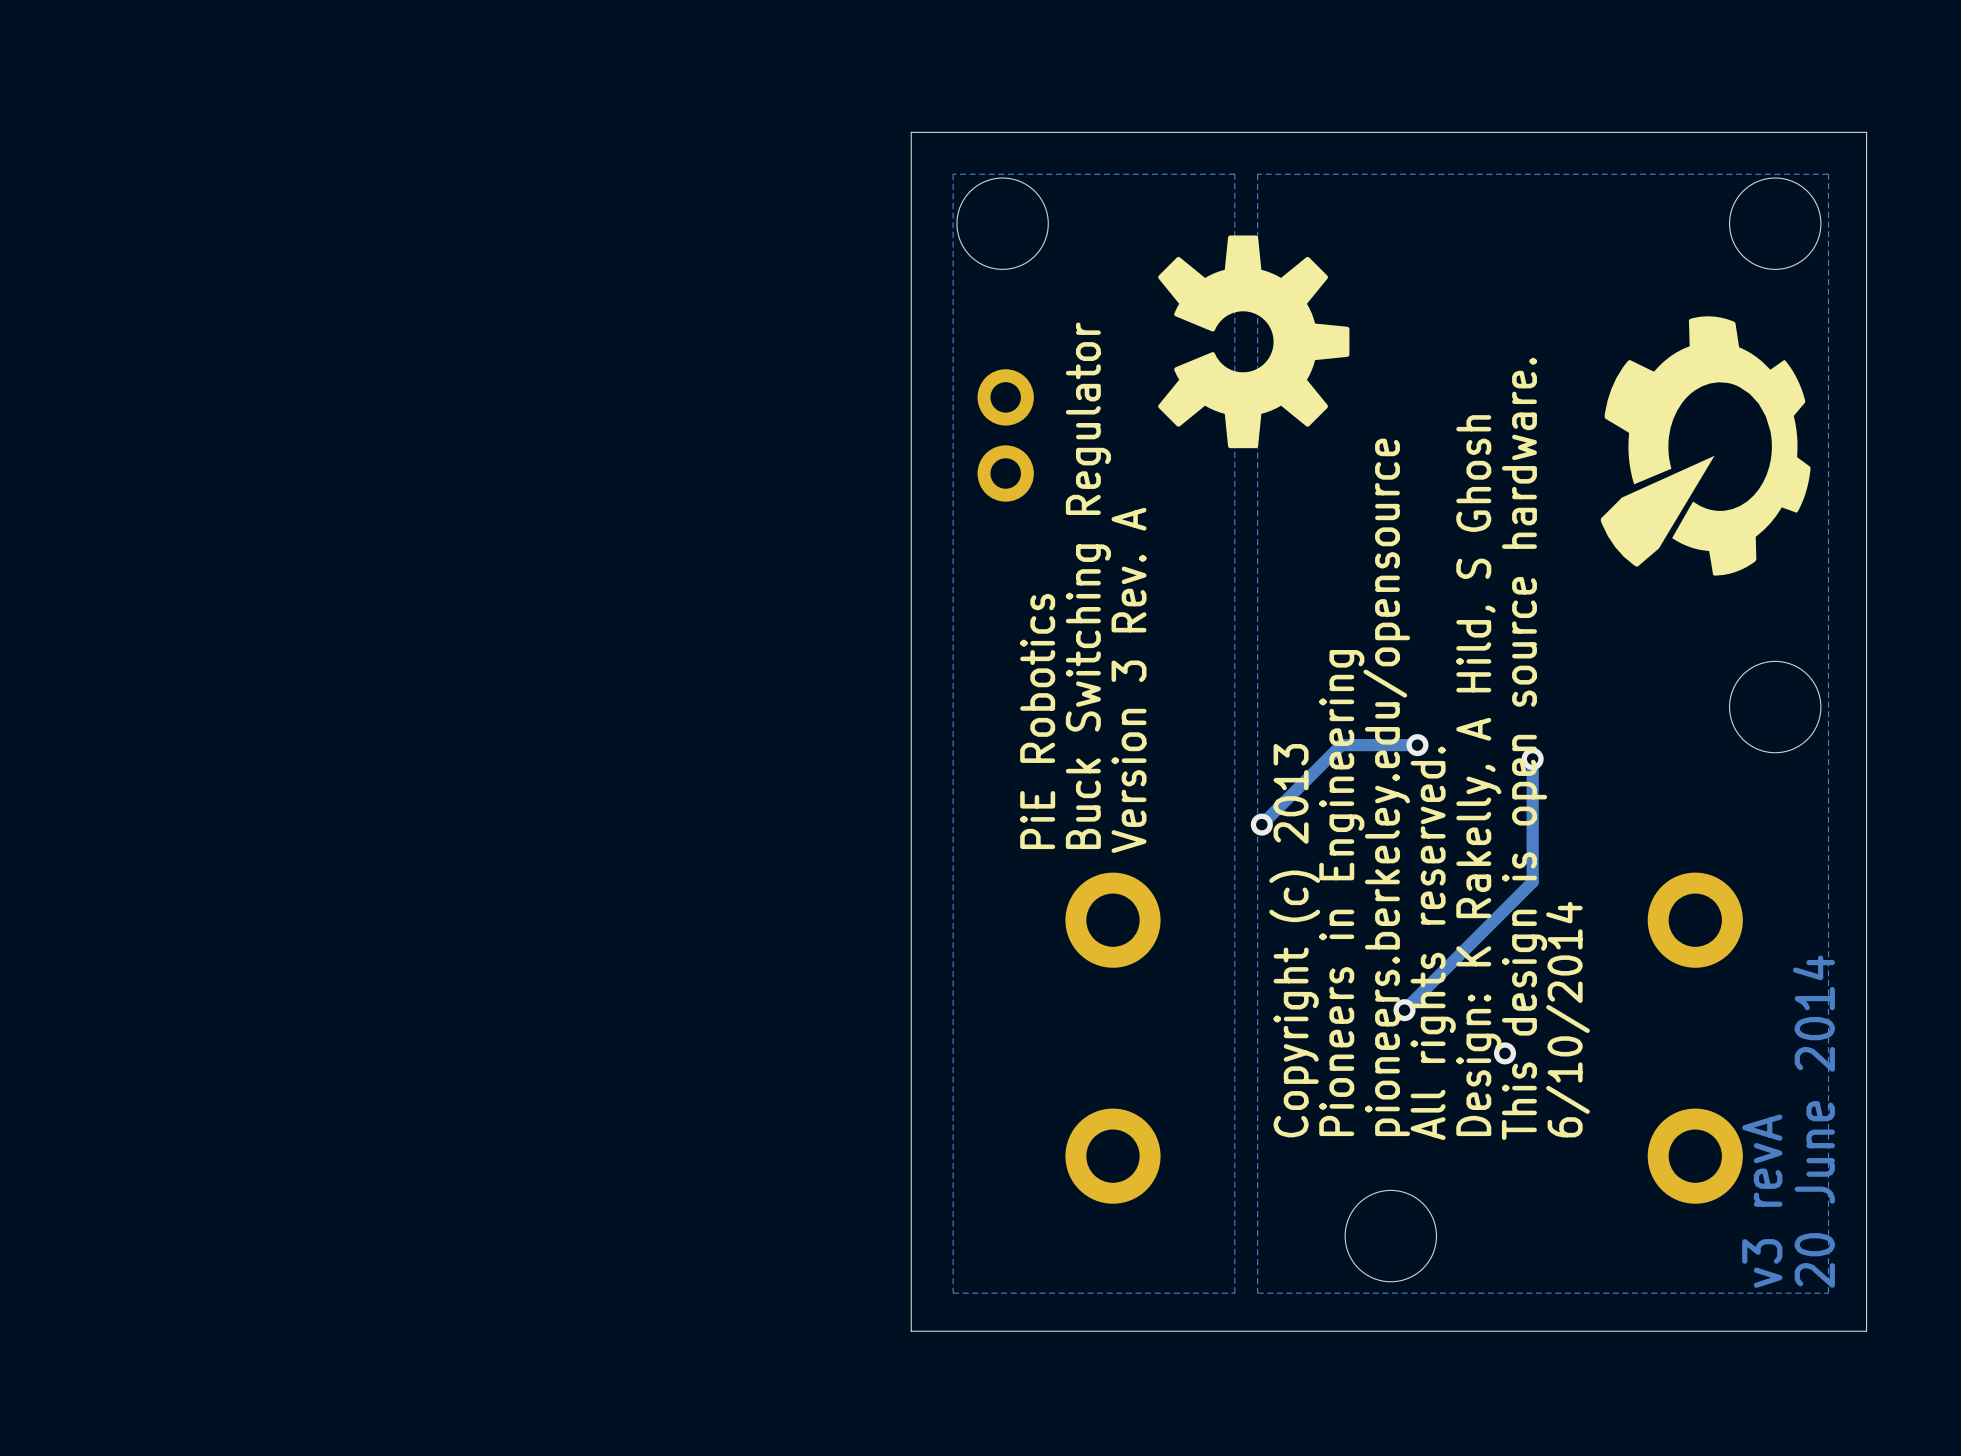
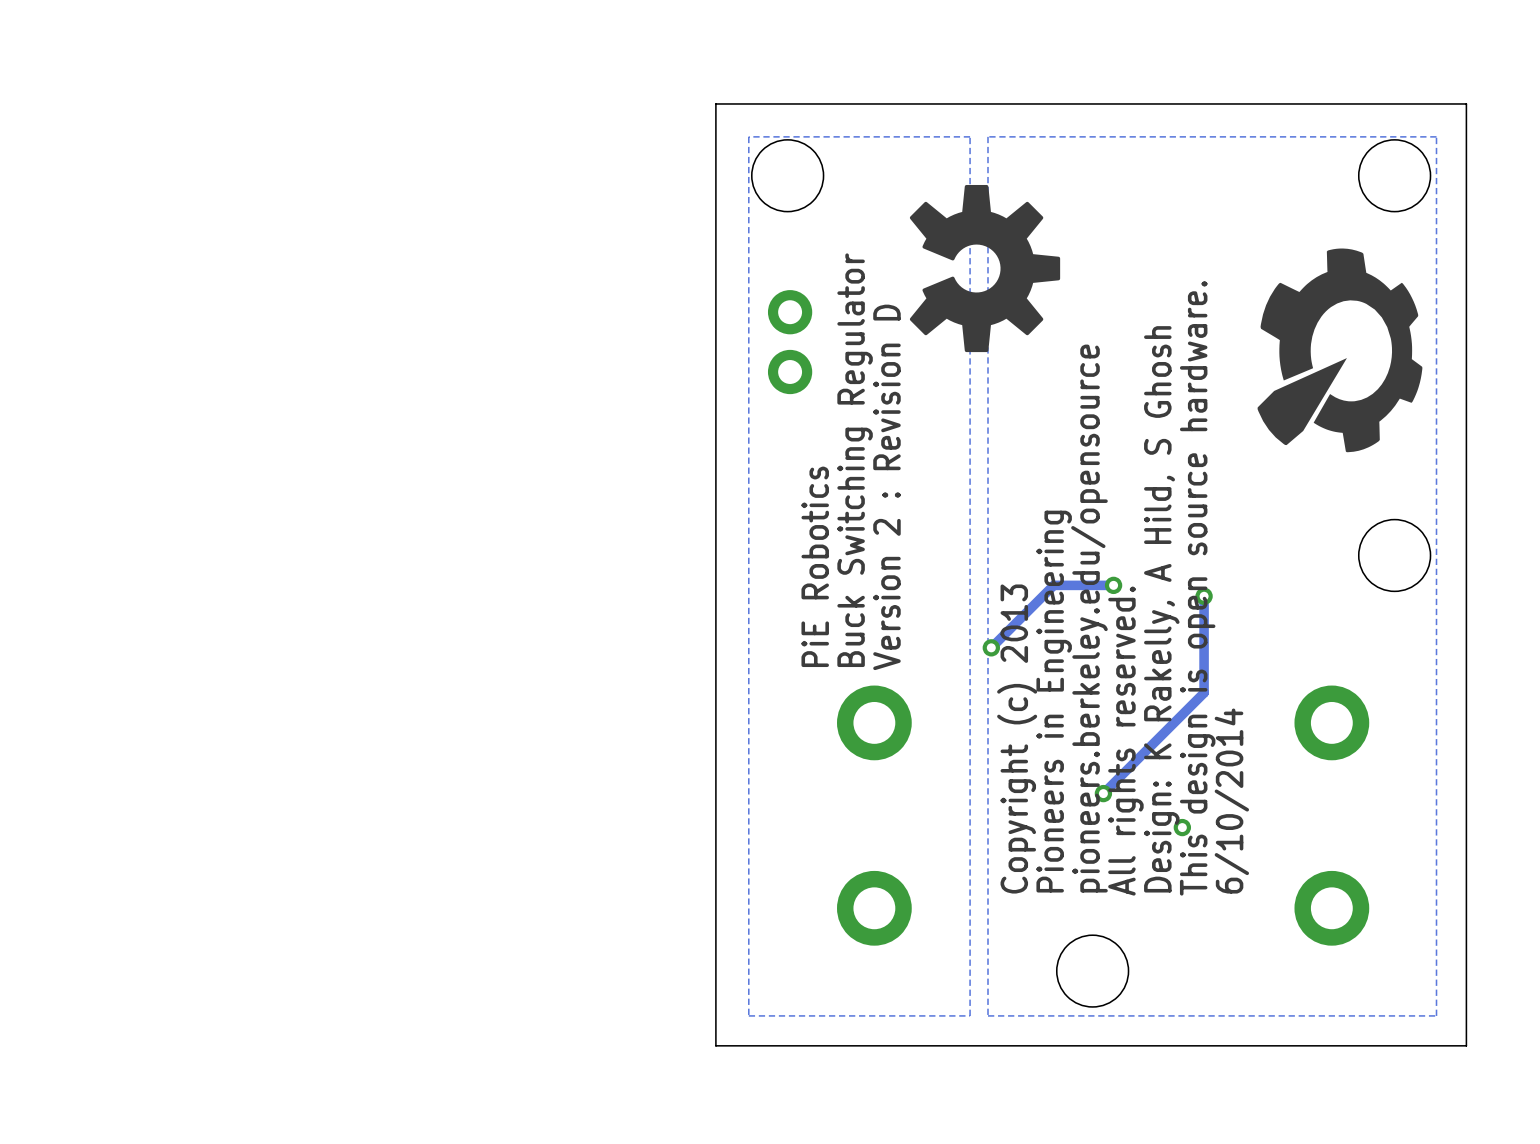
text: Version 3 Rev. A (1129, 680) -> Version 2 : Revision D (886, 487)
text: 20 June 2014 (1813, 1121) -> none
text: v3 revA (1762, 1201) -> none

